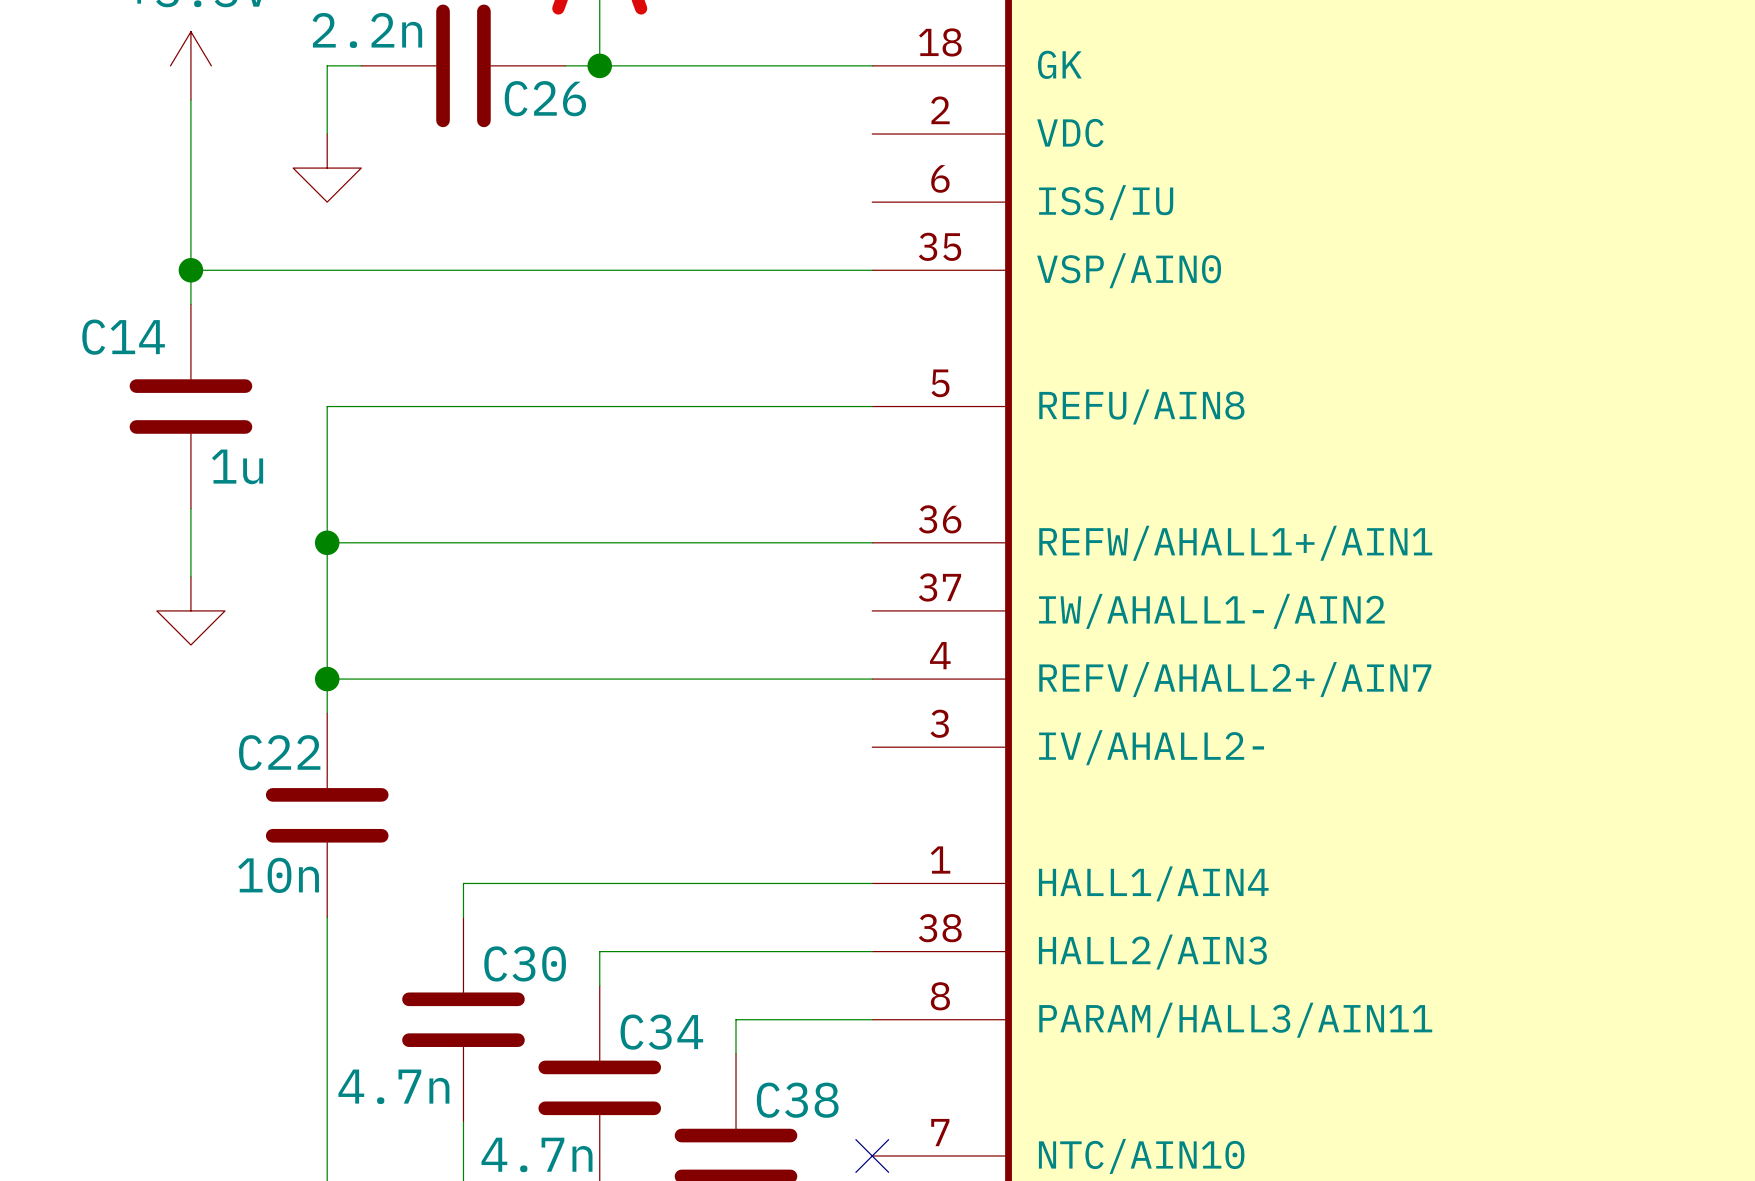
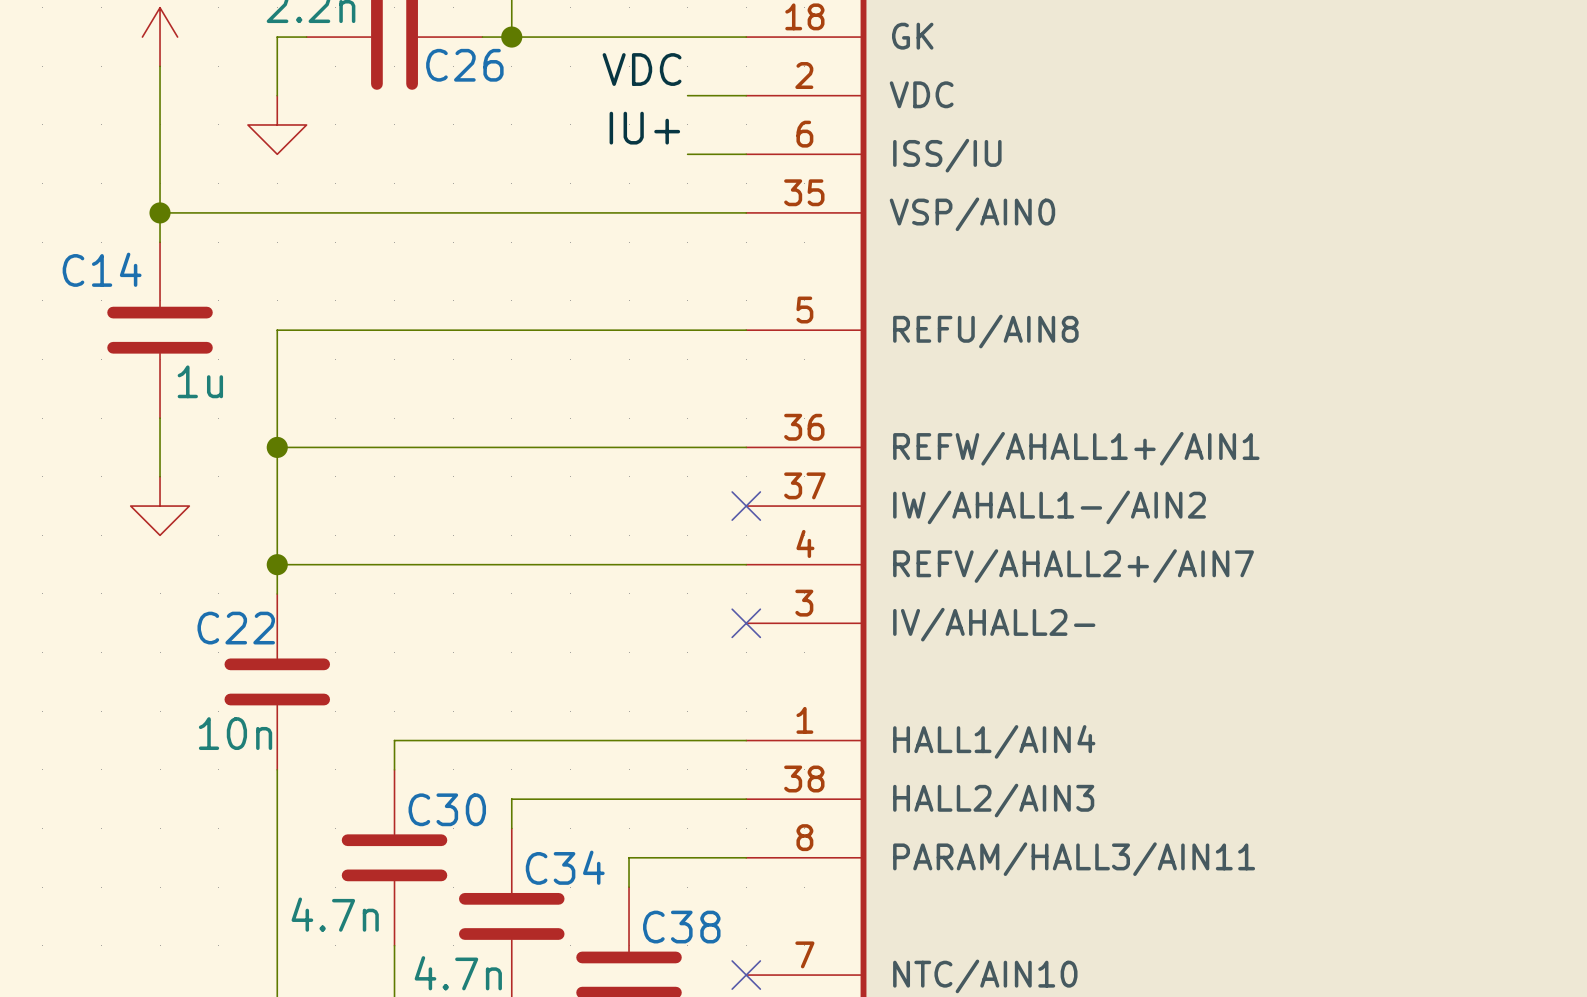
label: none -> VDC (642, 69)
wire: none -> (687, 95) (746, 95)
label: none -> IU+ (644, 128)
wire: none -> (687, 154) (746, 154)
no-connect mark: none -> (746, 506)
no-connect mark: none -> (746, 623)

